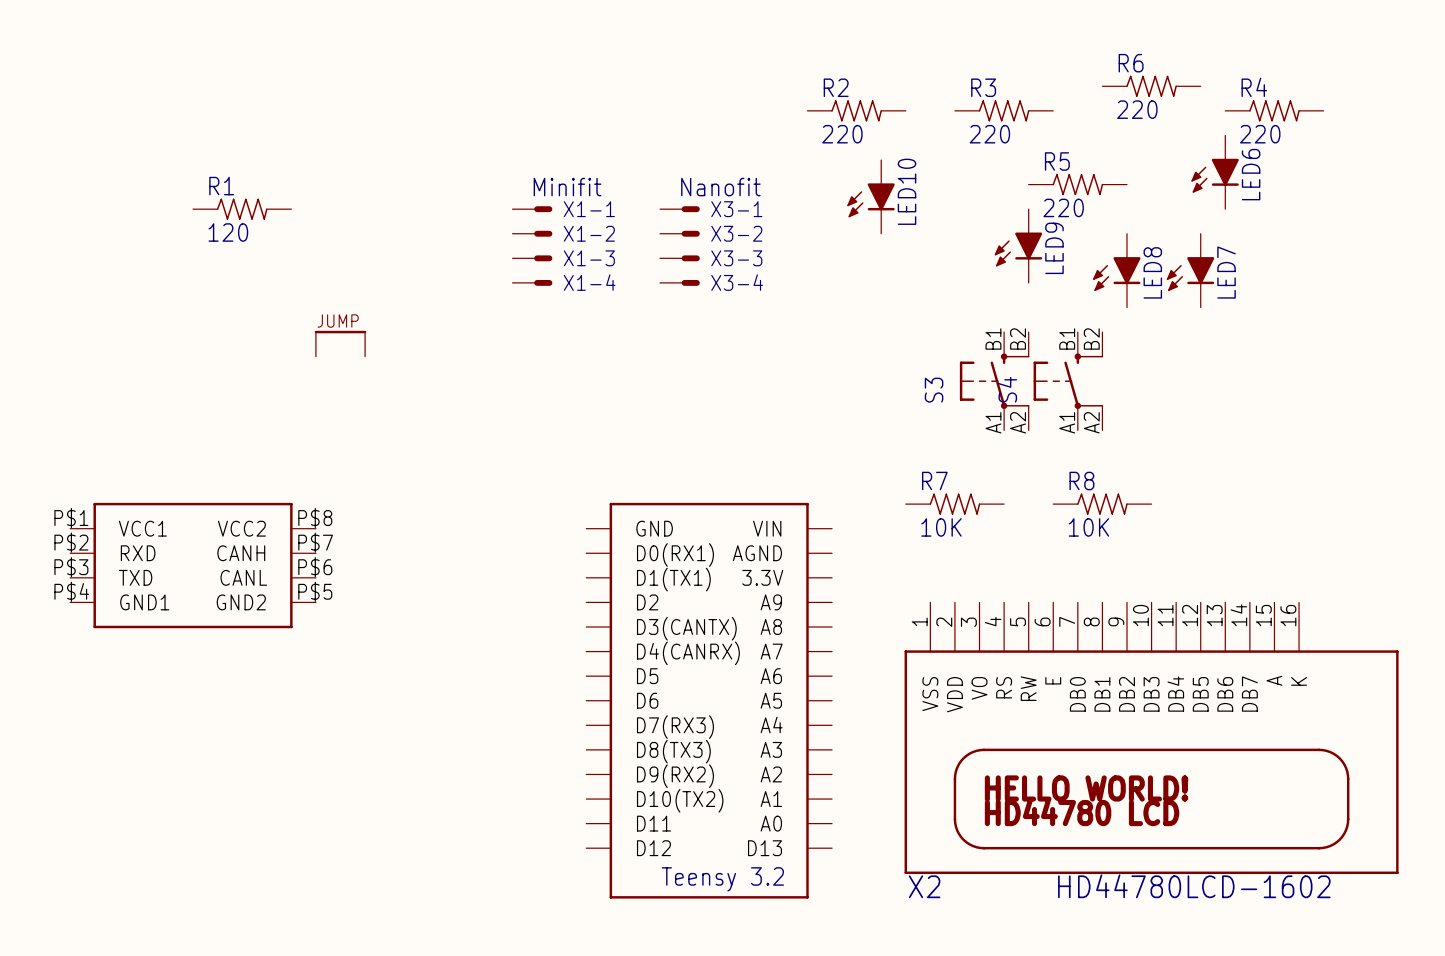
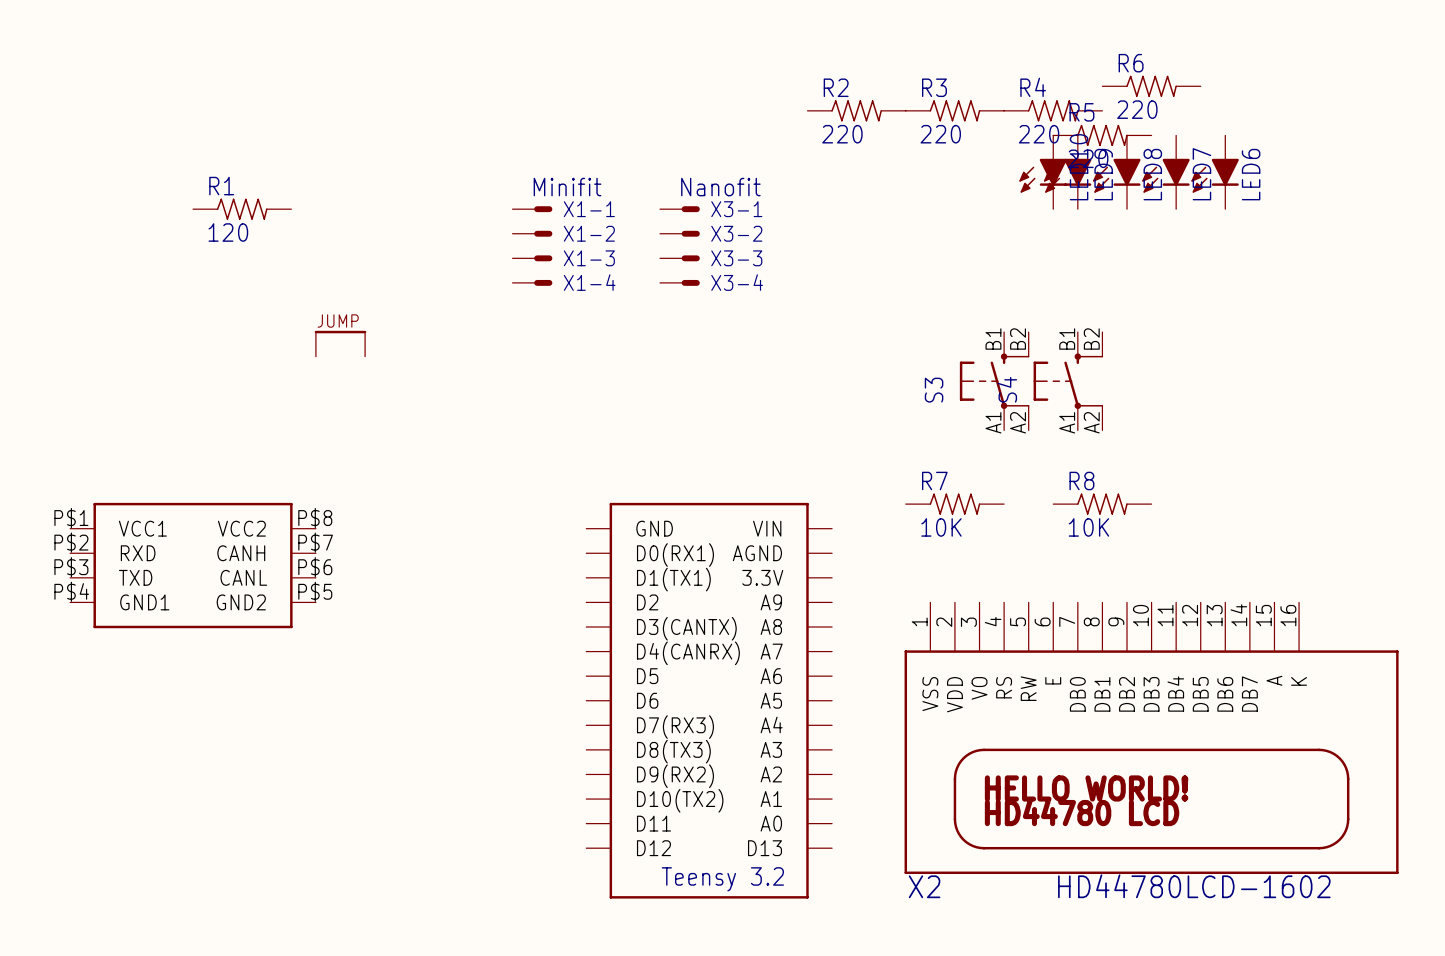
R3 position: (1004, 110) -> (954, 110)
R4 position: (1274, 110) -> (1053, 110)
R5 position: (1077, 184) -> (1102, 135)
LED10 position: (871, 196) -> (1043, 172)
LED9 position: (1018, 246) -> (1067, 172)
LED8 position: (1116, 270) -> (1116, 172)
LED7 position: (1190, 270) -> (1165, 172)

